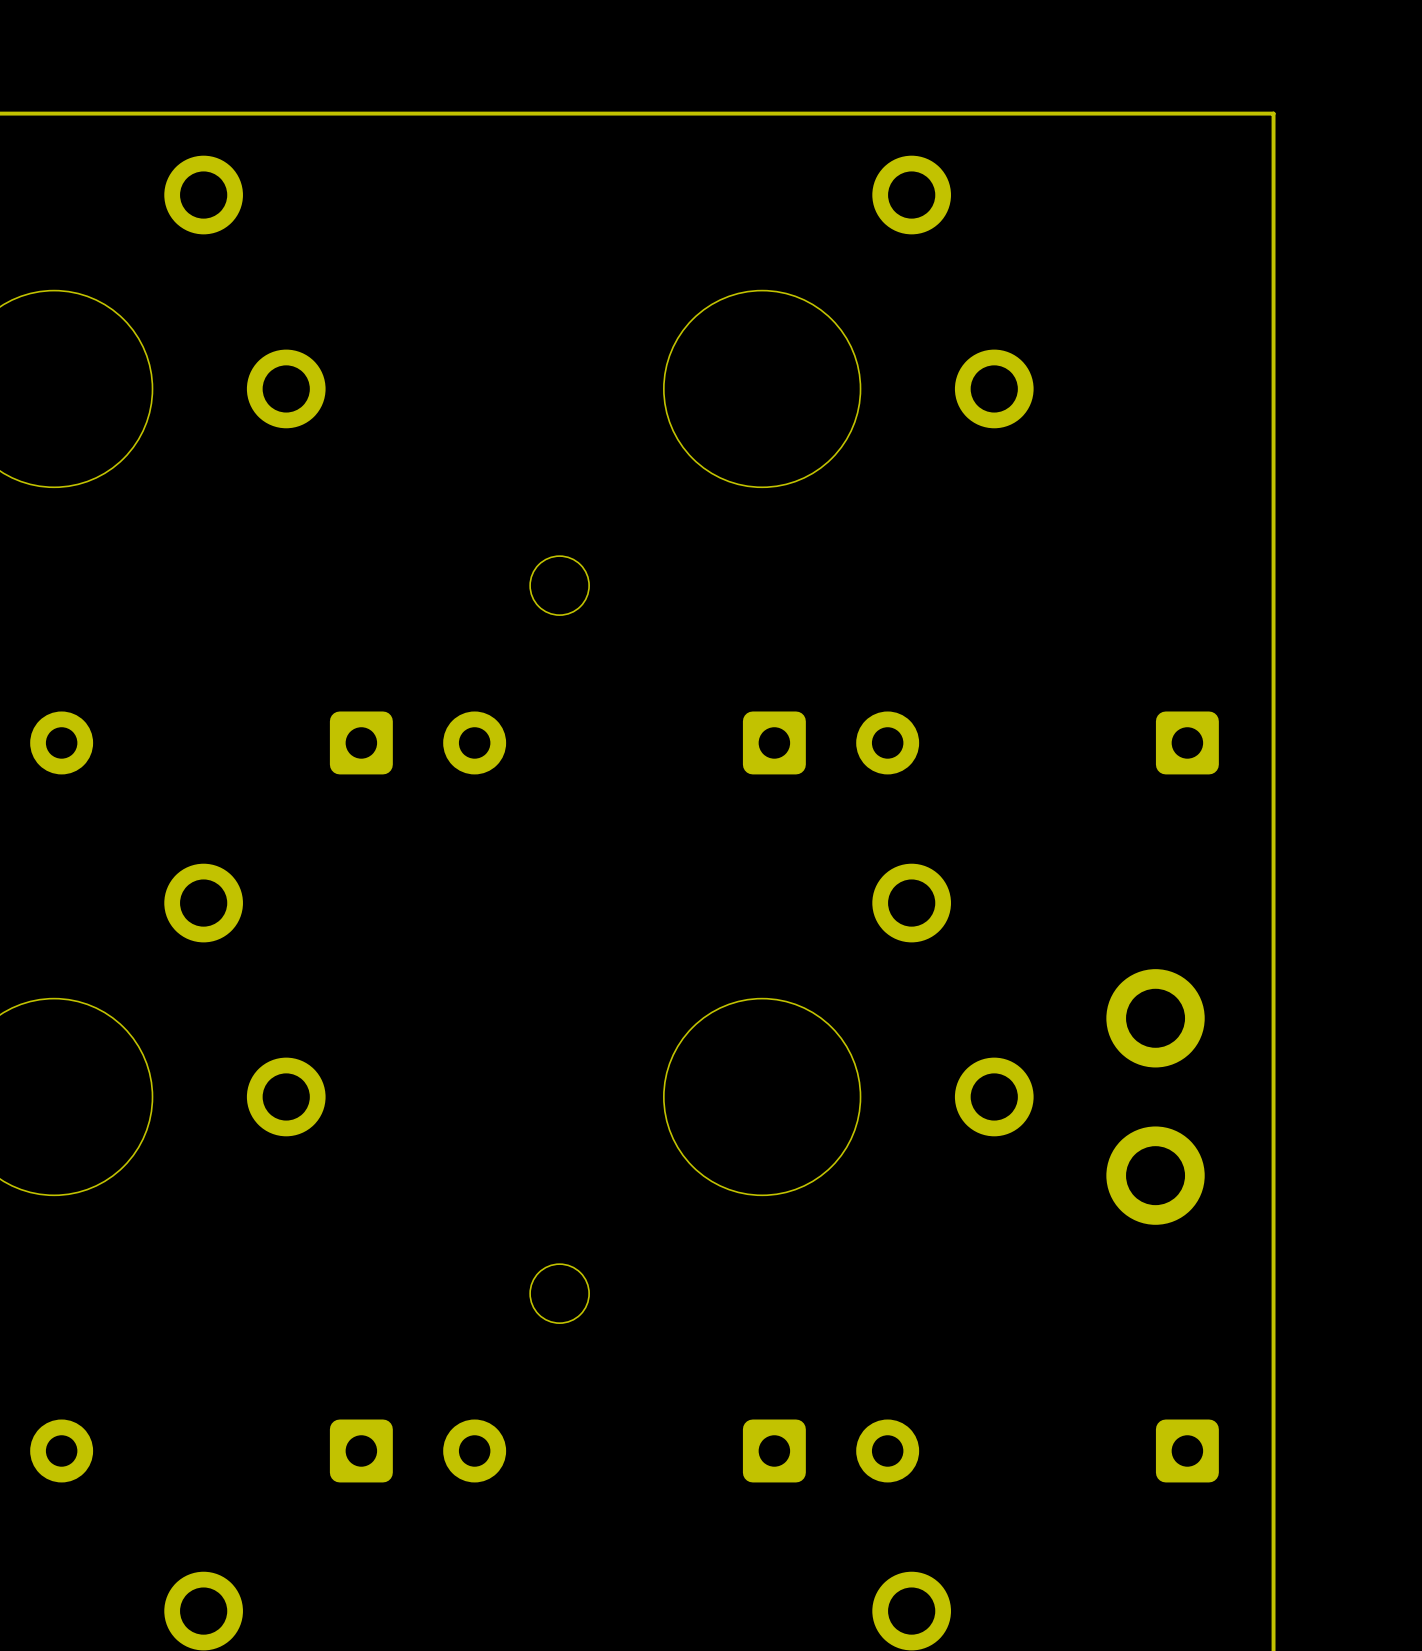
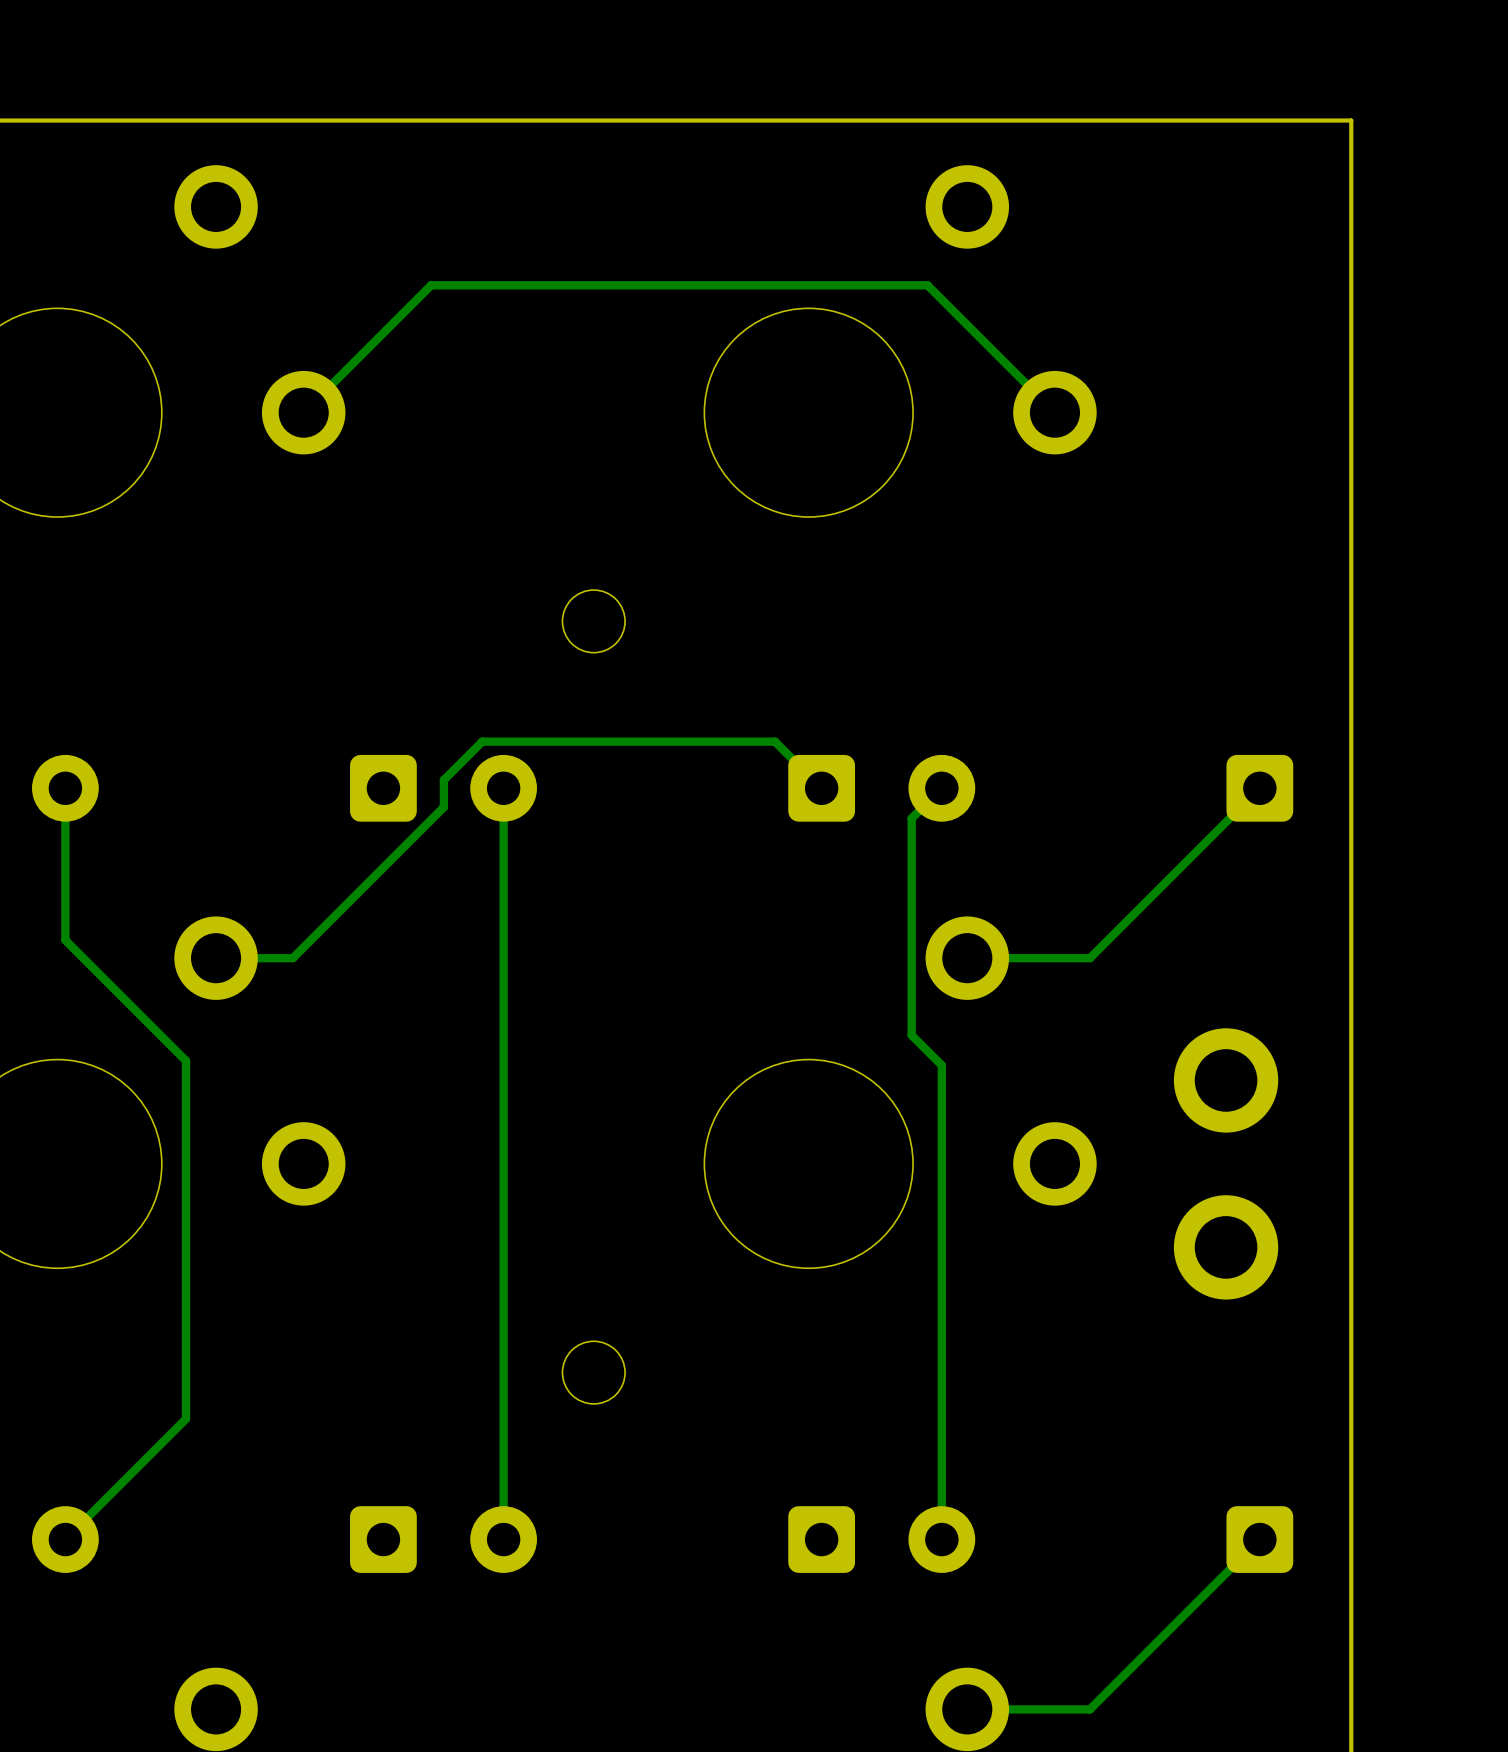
track: none -> (1054, 412) (927, 285) (431, 285) (303, 412)
track: none -> (65, 788) (65, 940) (186, 1060) (186, 1418) (65, 1539)
track: none -> (503, 788) (503, 1539)
track: none -> (821, 788) (775, 741) (482, 741) (443, 780) (443, 807) (292, 958) (216, 958)
track: none -> (941, 788) (911, 818) (911, 1035) (941, 1065) (941, 1539)
track: none -> (1259, 788) (1090, 958) (967, 958)
track: none -> (1259, 1539) (1090, 1709) (967, 1709)

